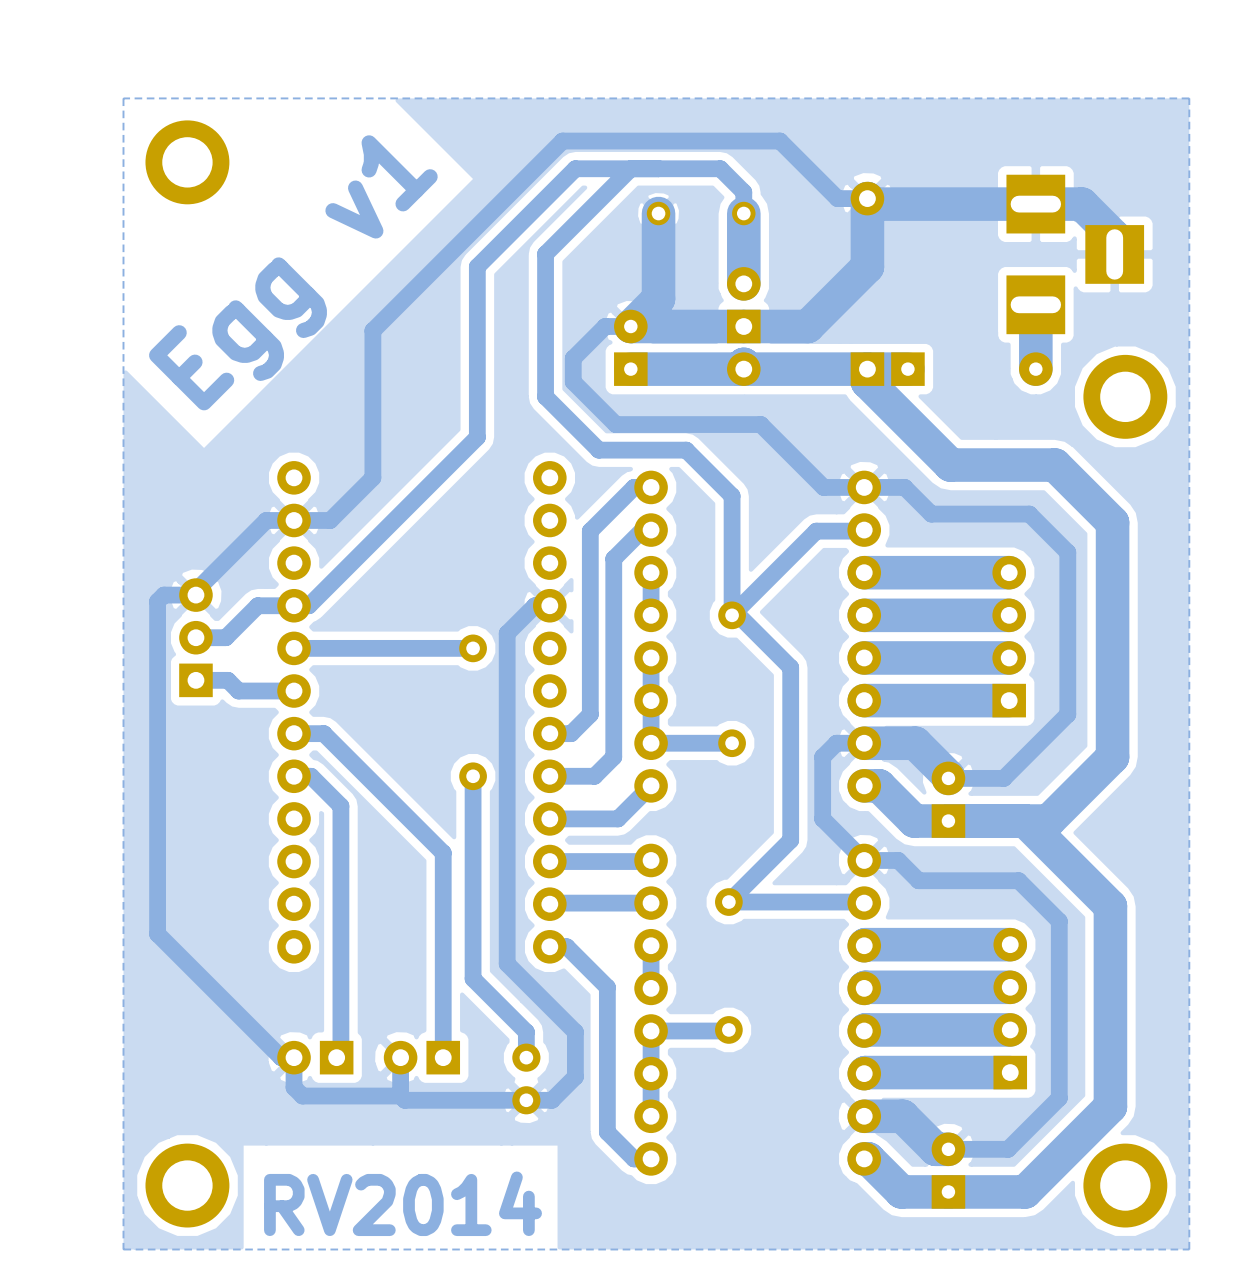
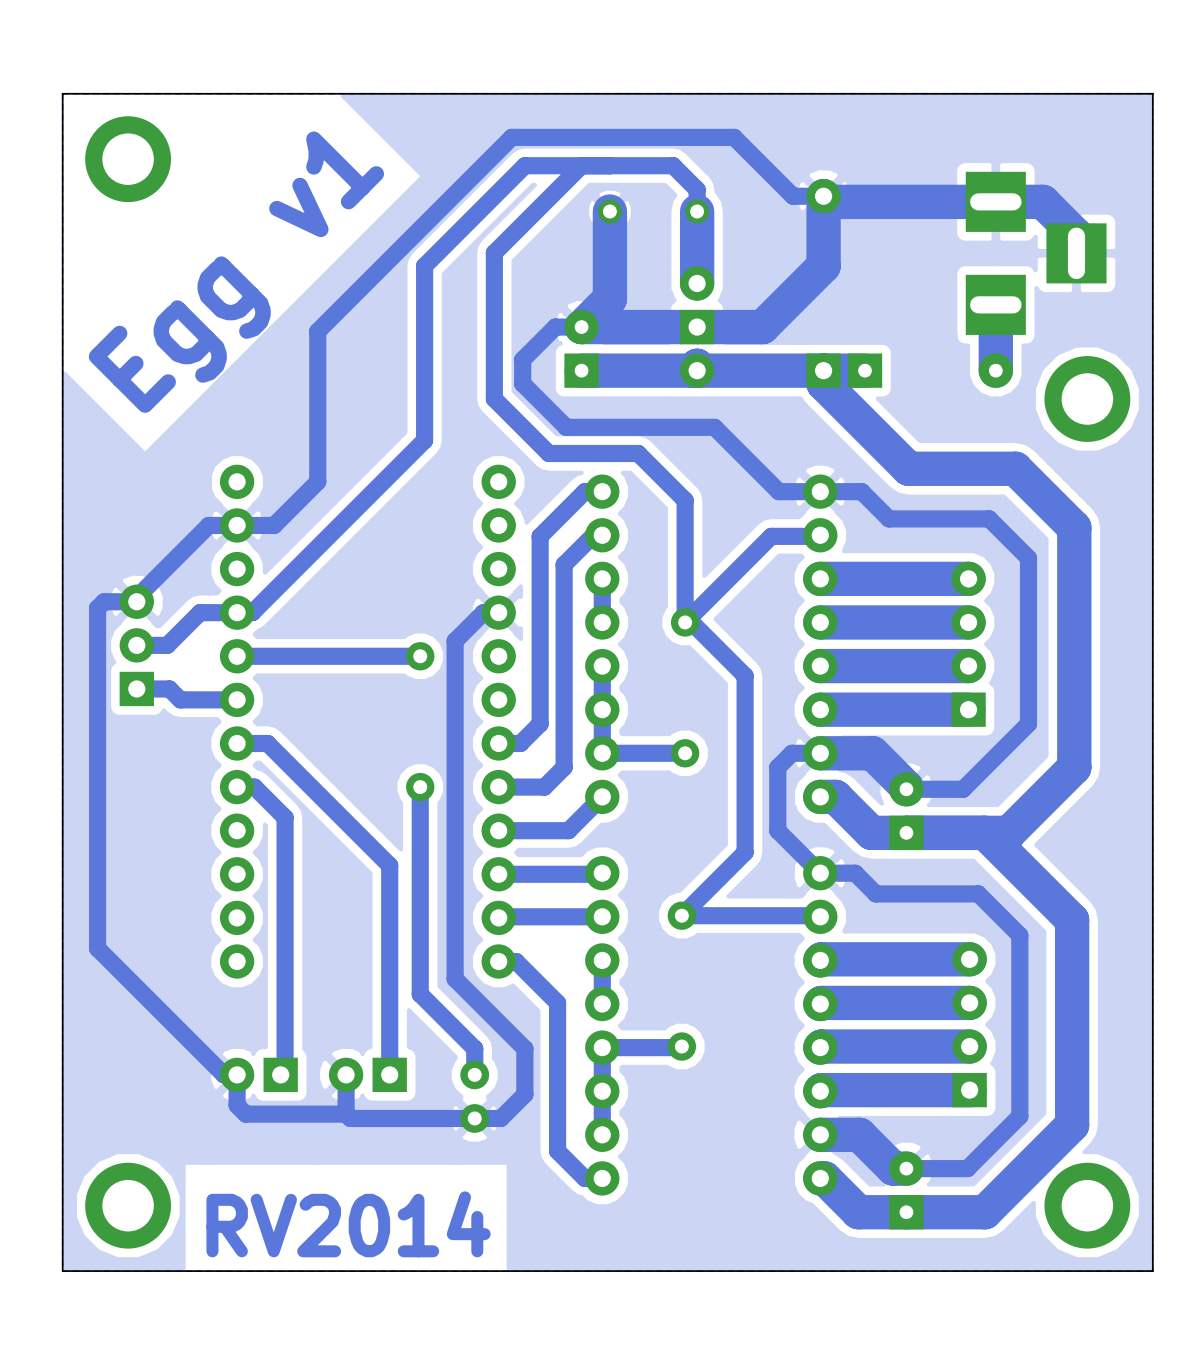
board edge: none -> (1152, 93) (62, 93) (62, 1271) (1152, 1271) (1152, 93)

